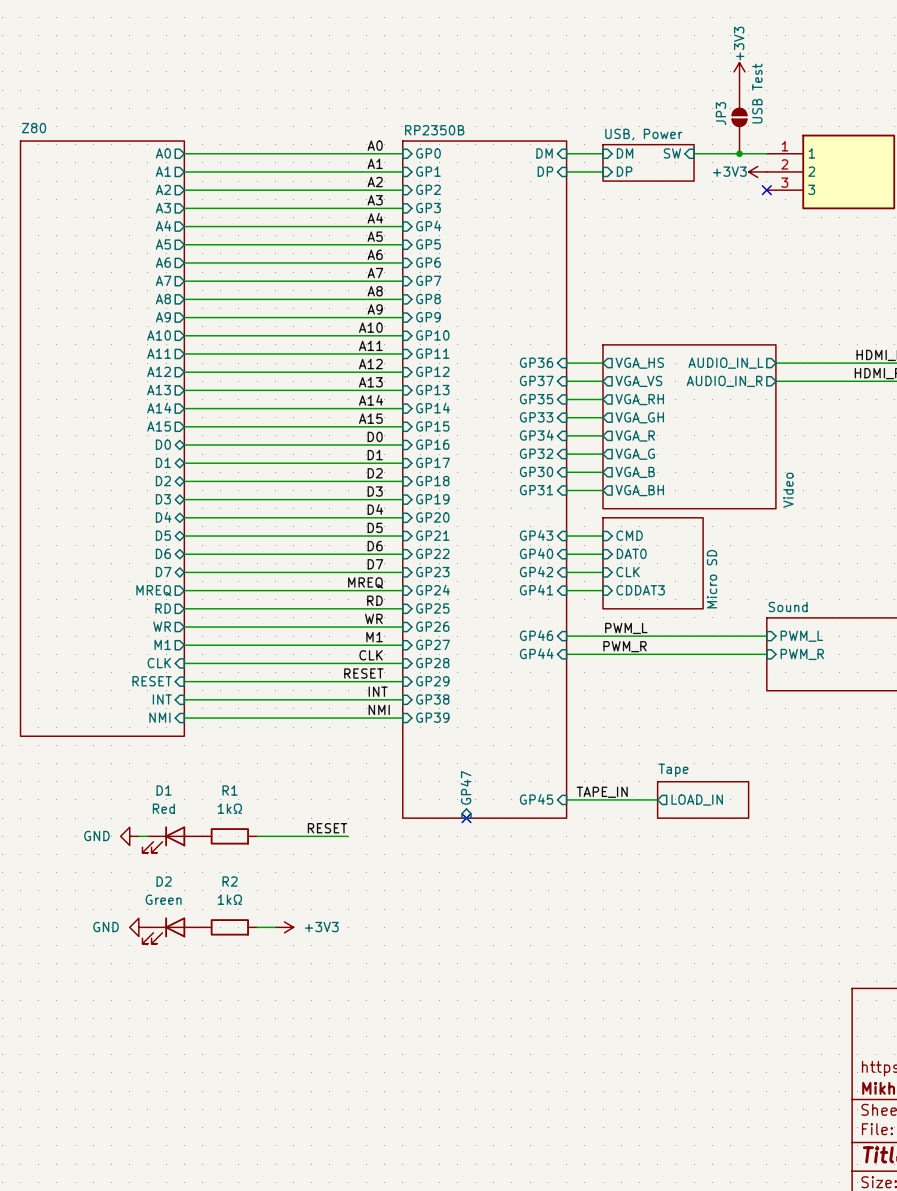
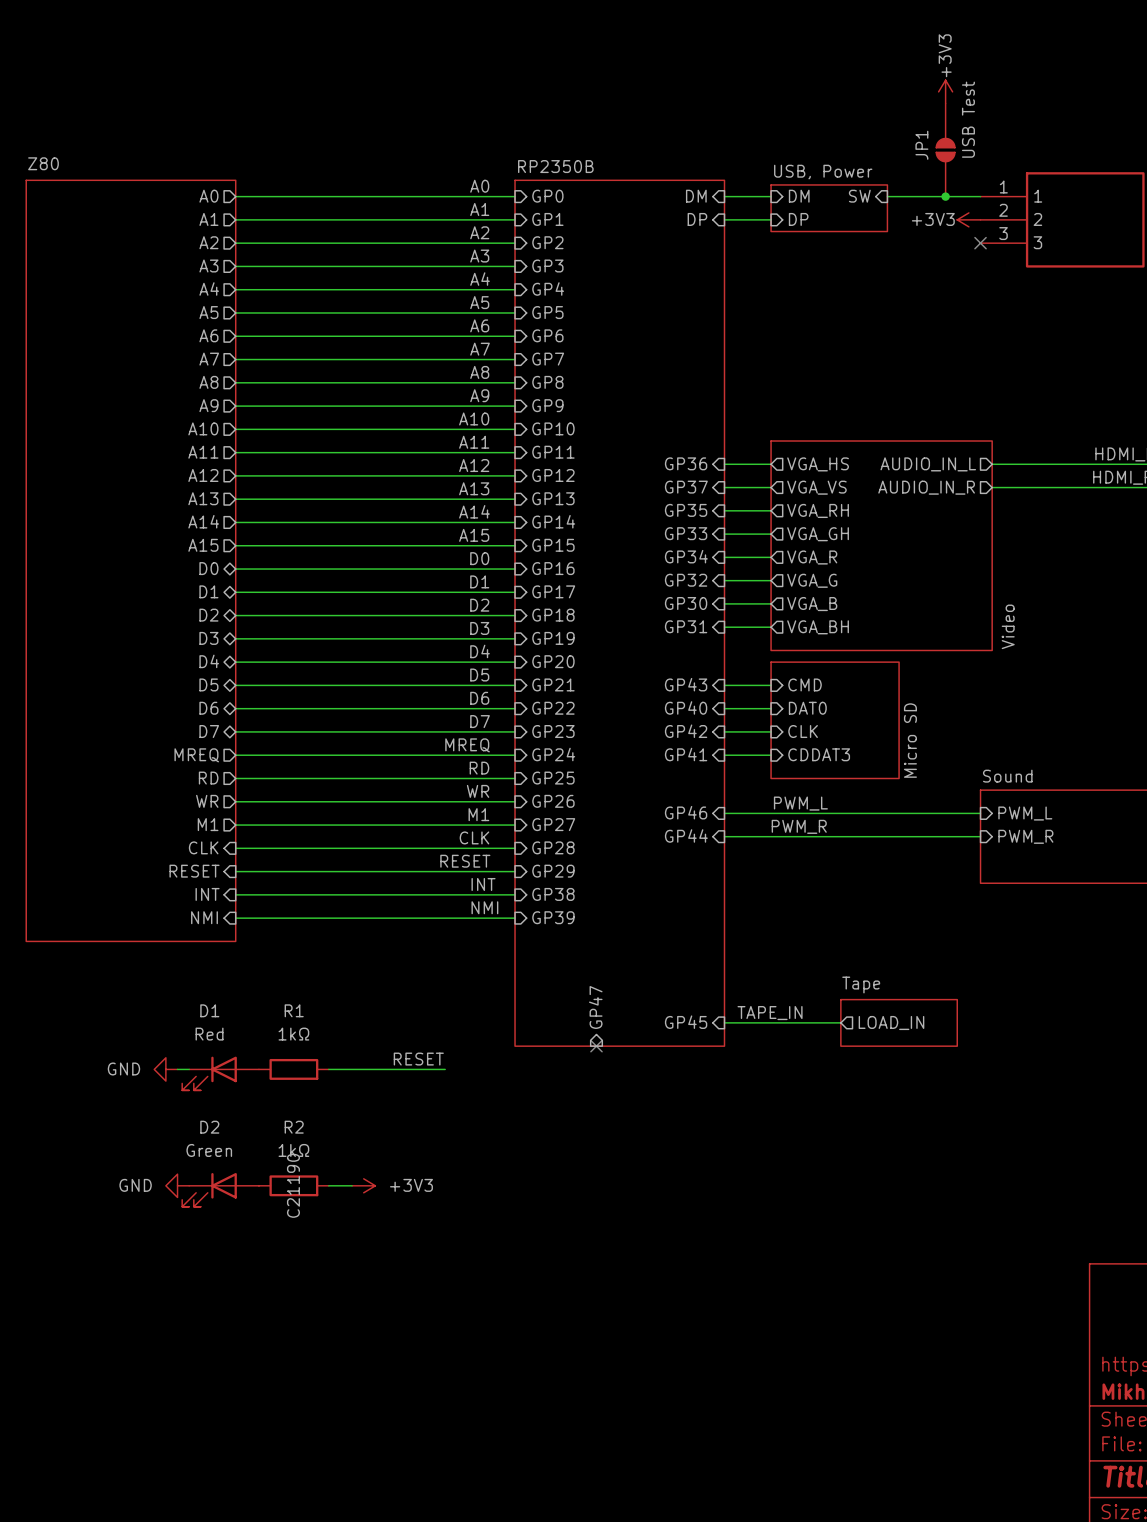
JP3 name: JP3 (720, 113) -> JP1 (921, 145)
R2 text: none -> C21190 (293, 1185)

